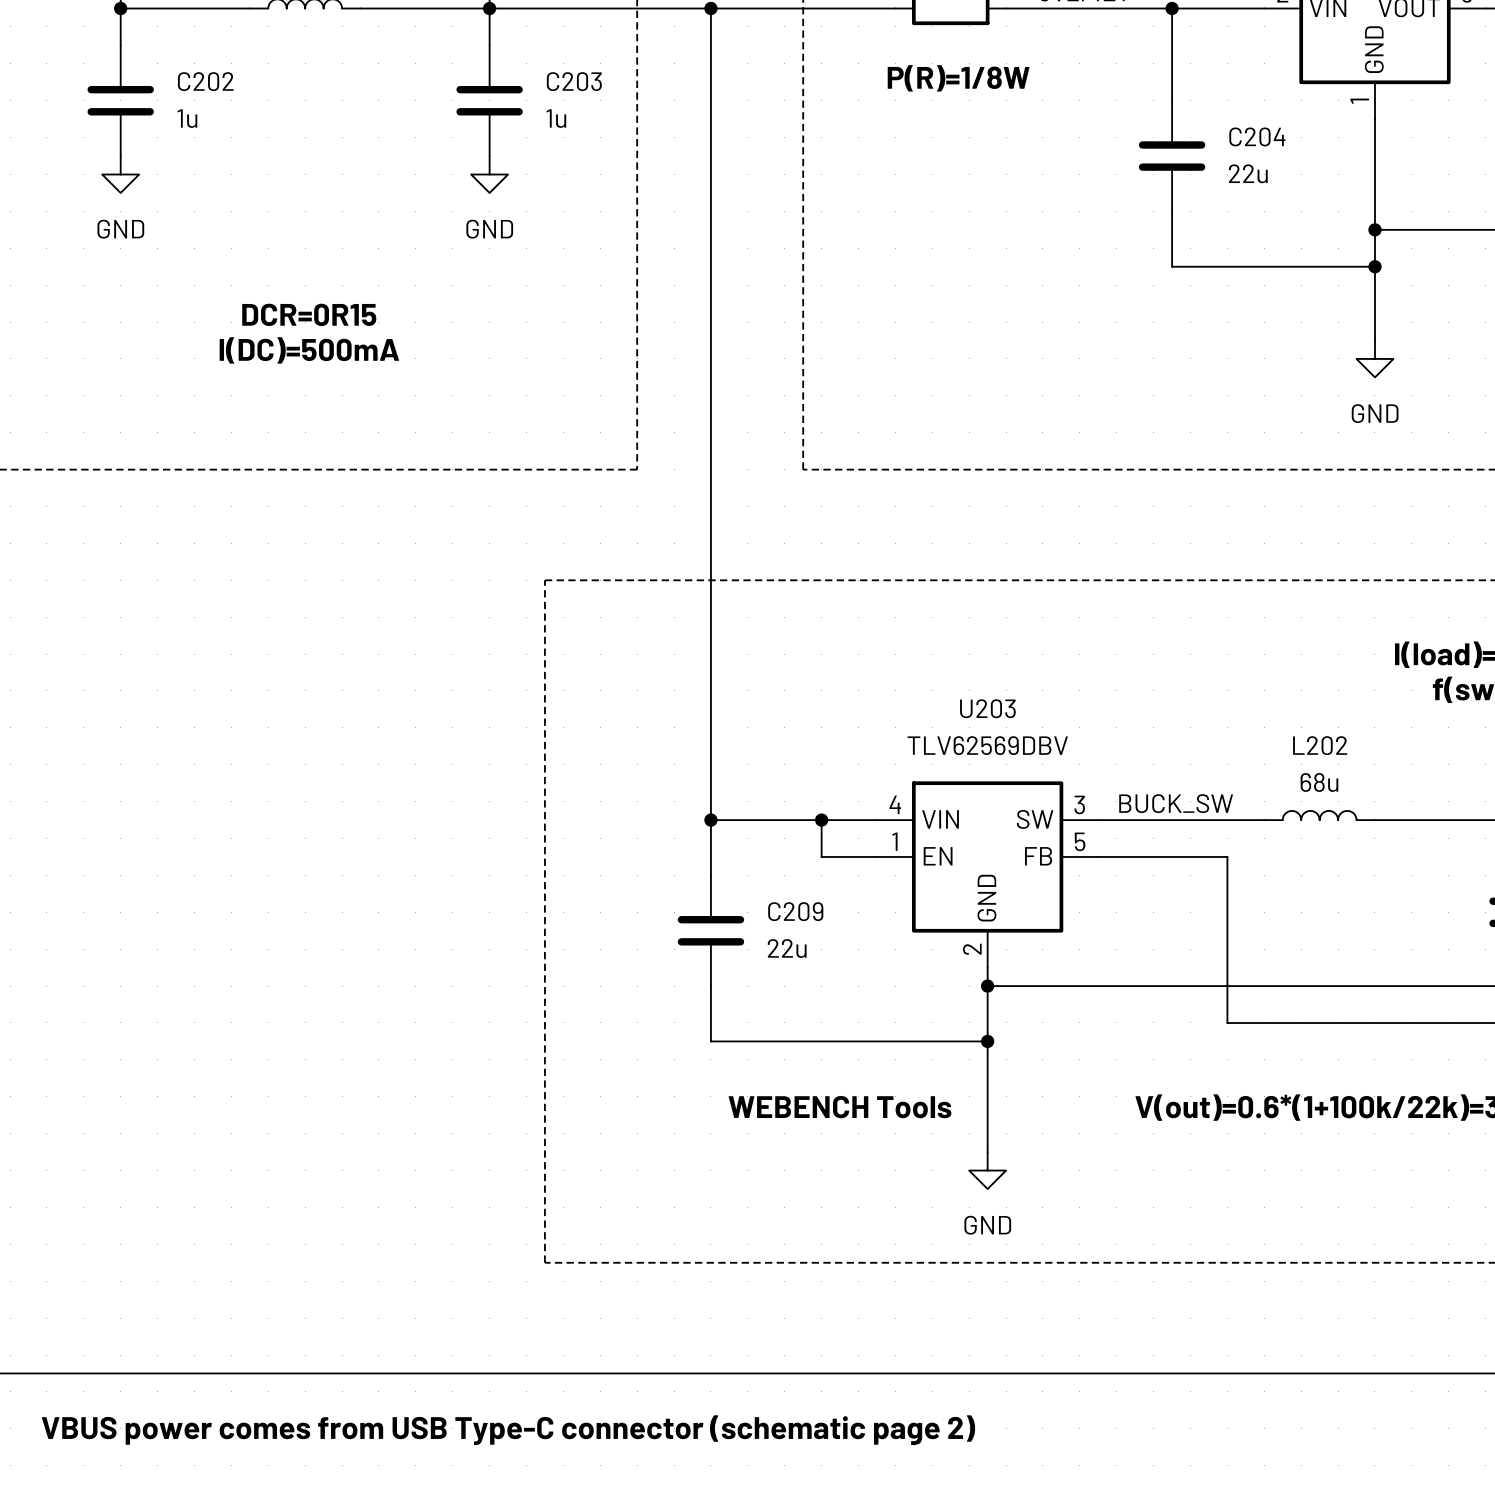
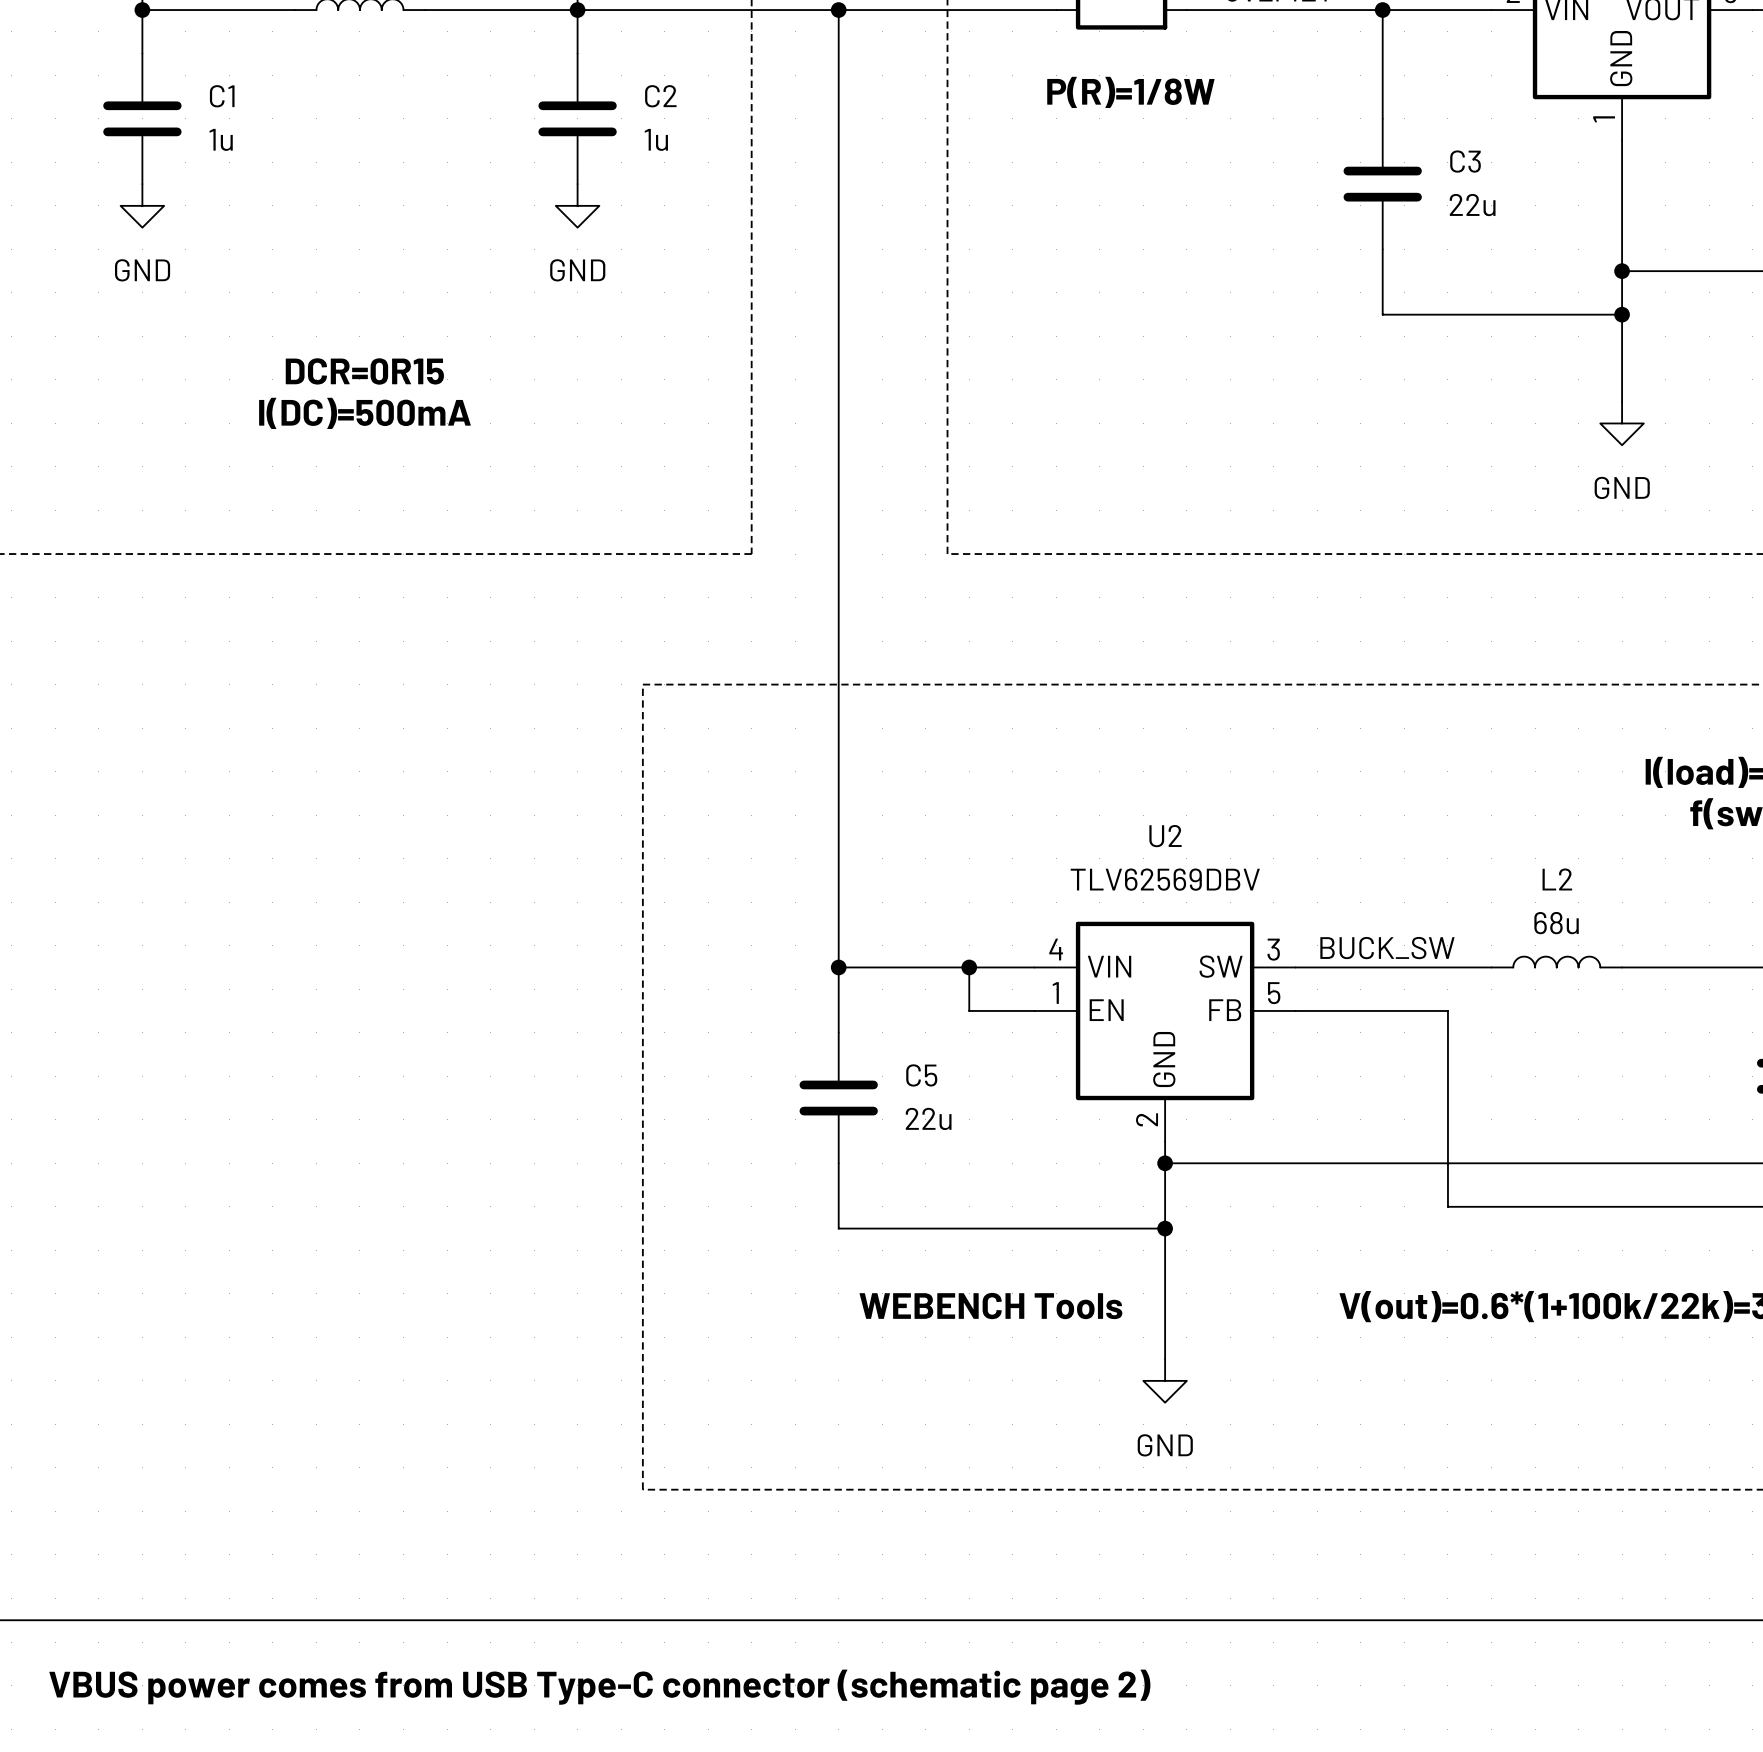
C202 name: C202 (205, 81) -> C1 (222, 96)
C203 name: C203 (574, 81) -> C2 (660, 96)
C204 name: C204 (1257, 136) -> C3 (1465, 161)
U203 name: U203 (987, 708) -> U2 (1165, 836)
L202 name: L202 (1320, 745) -> L2 (1557, 879)
C209 name: C209 (795, 911) -> C5 (921, 1075)

